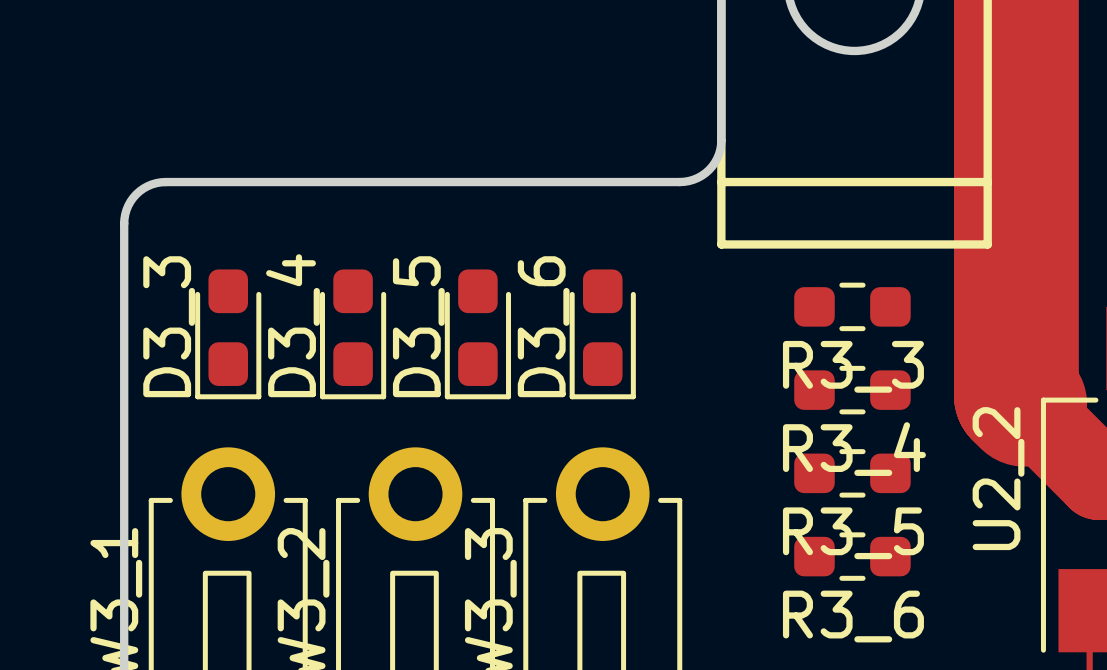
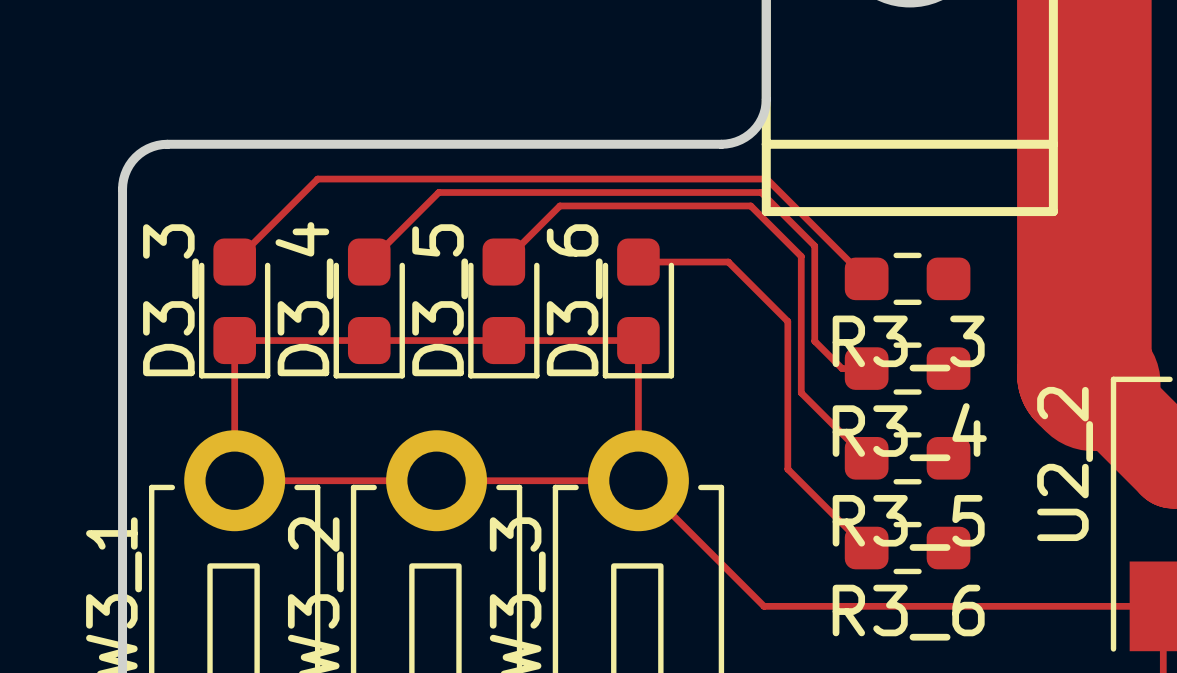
track: none -> (234, 262) (317, 179) (766, 179) (866, 278)
track: none -> (369, 262) (438, 192) (761, 192) (814, 245) (814, 341) (842, 368) (866, 368)
track: none -> (503, 262) (559, 205) (750, 205) (801, 256) (801, 392) (866, 458)
track: none -> (638, 262) (728, 262) (787, 321) (787, 469) (866, 548)
track: none -> (638, 480) (764, 606) (1163, 606)
track: none -> (638, 480) (638, 340) (234, 340) (234, 480) (638, 480)

